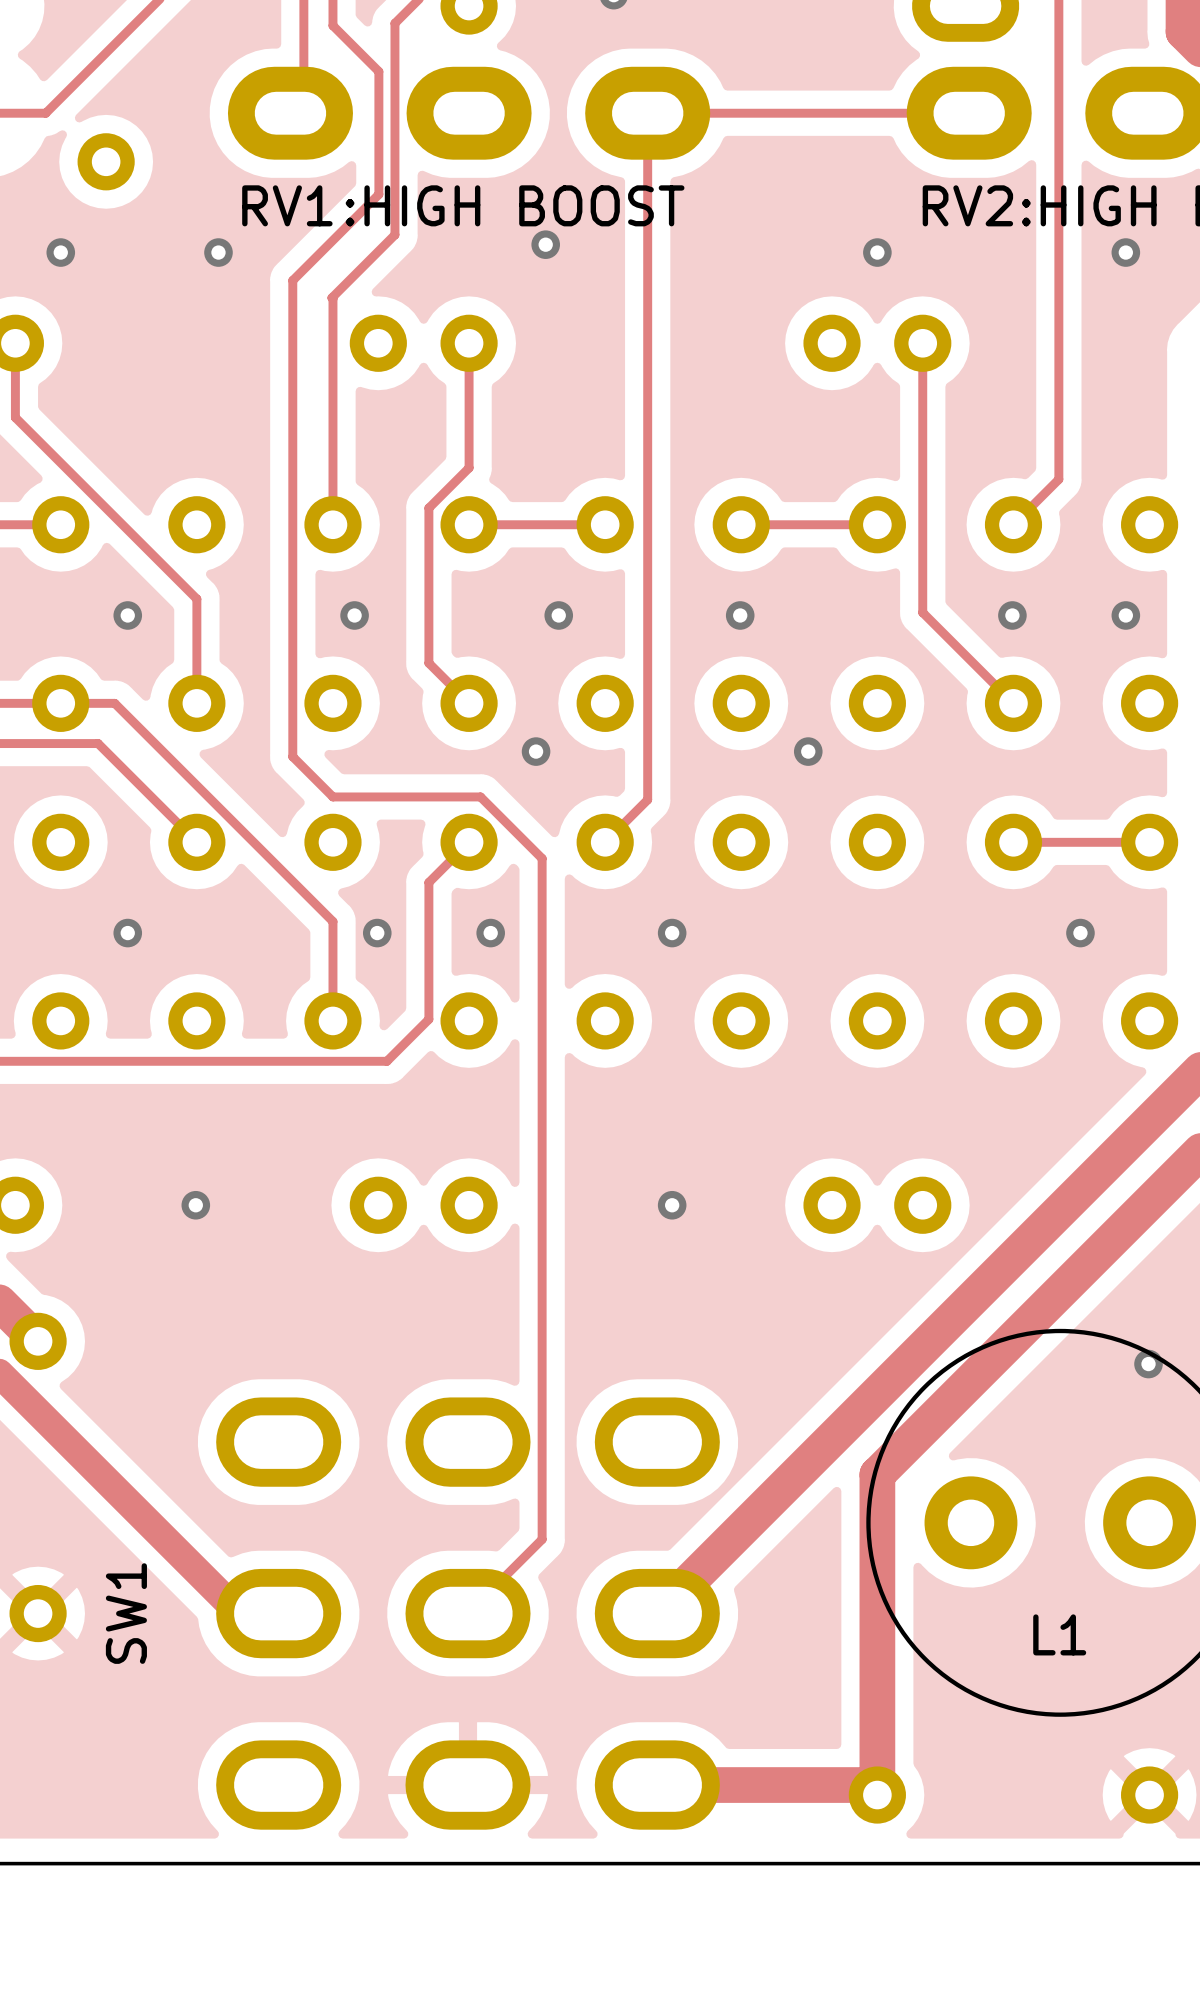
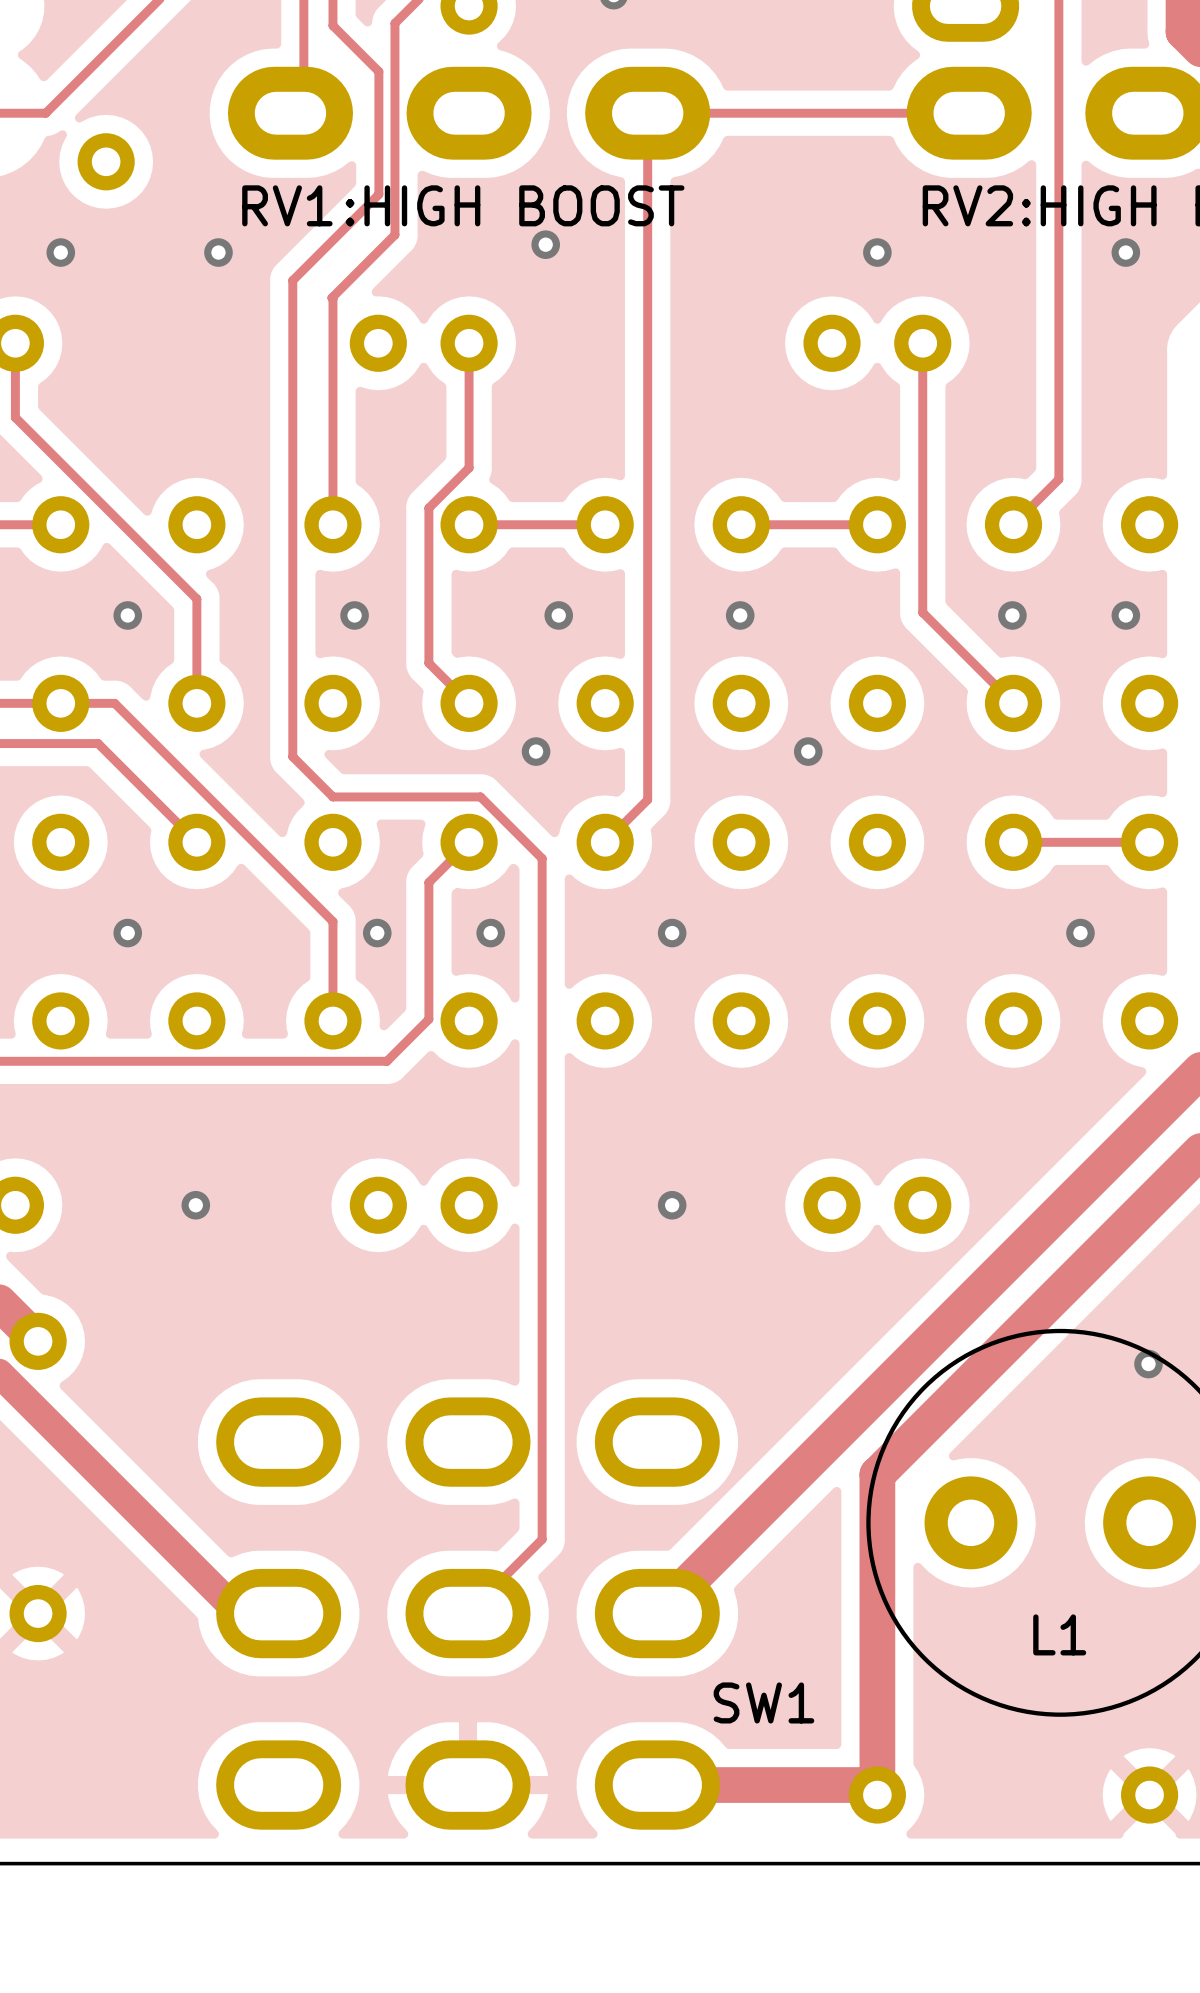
SW1 name rotation: 0° (126, 1613) -> 90° clockwise (763, 1702)
SW1 name position: SW1 (126, 1613) -> SW1 (763, 1702)

